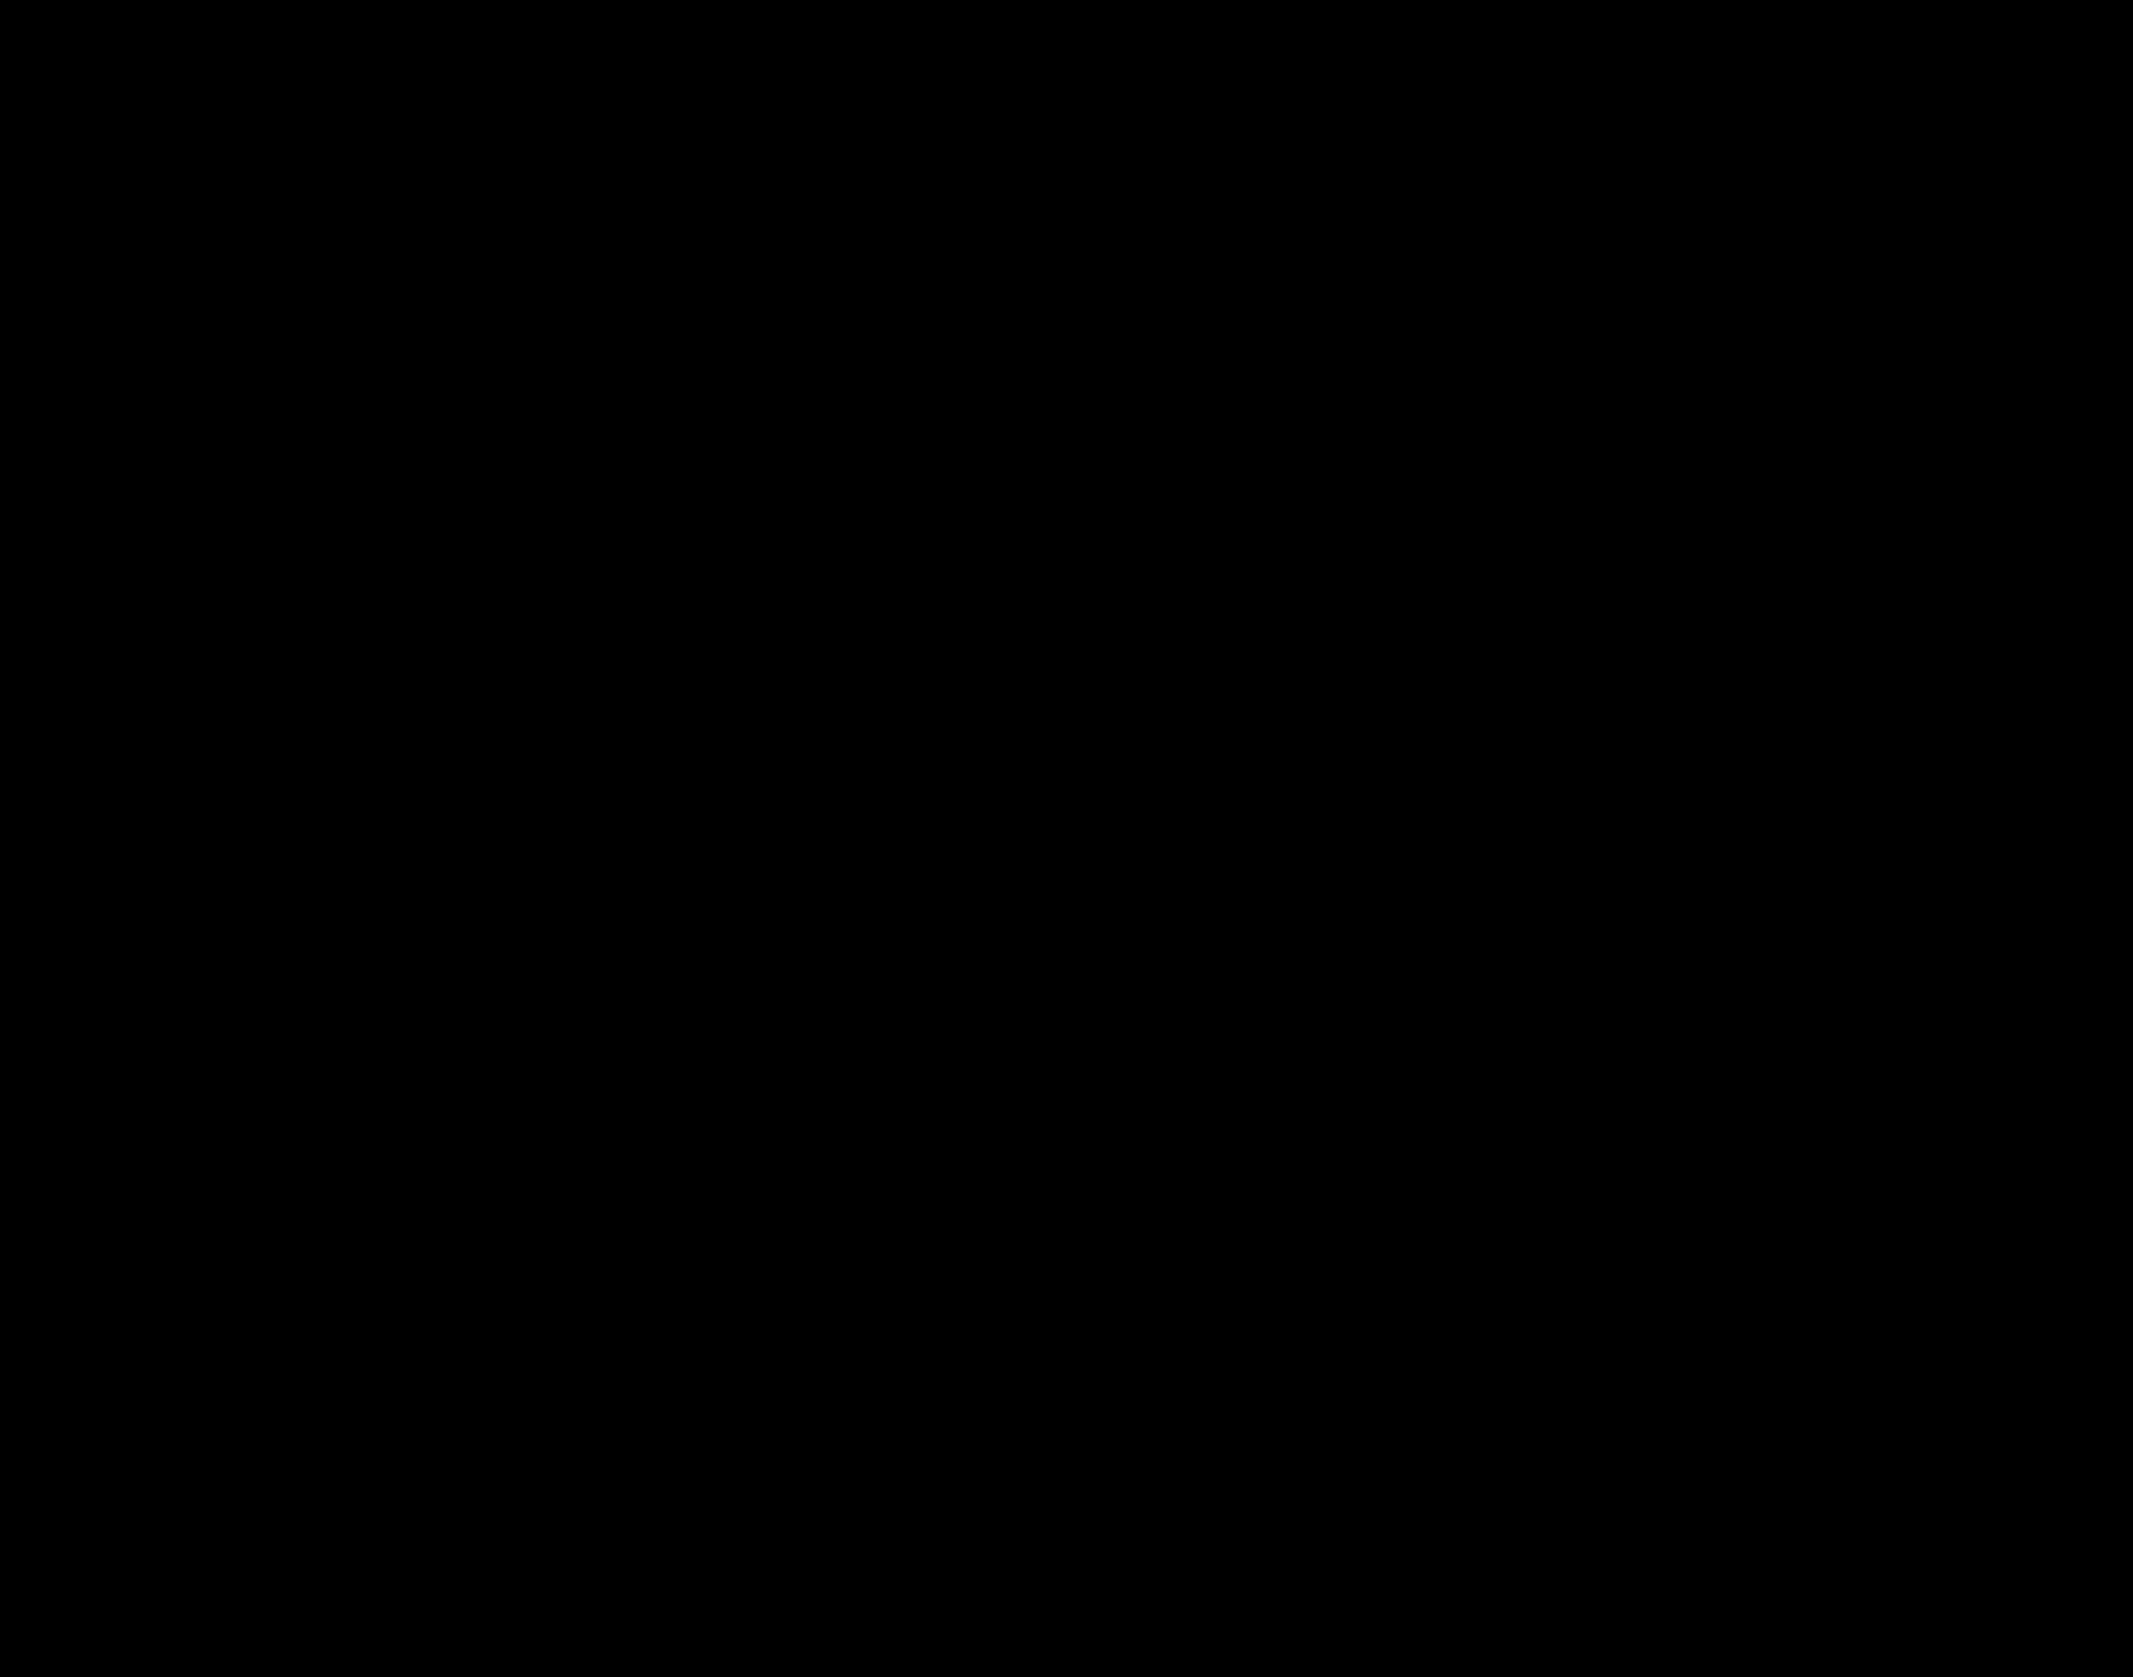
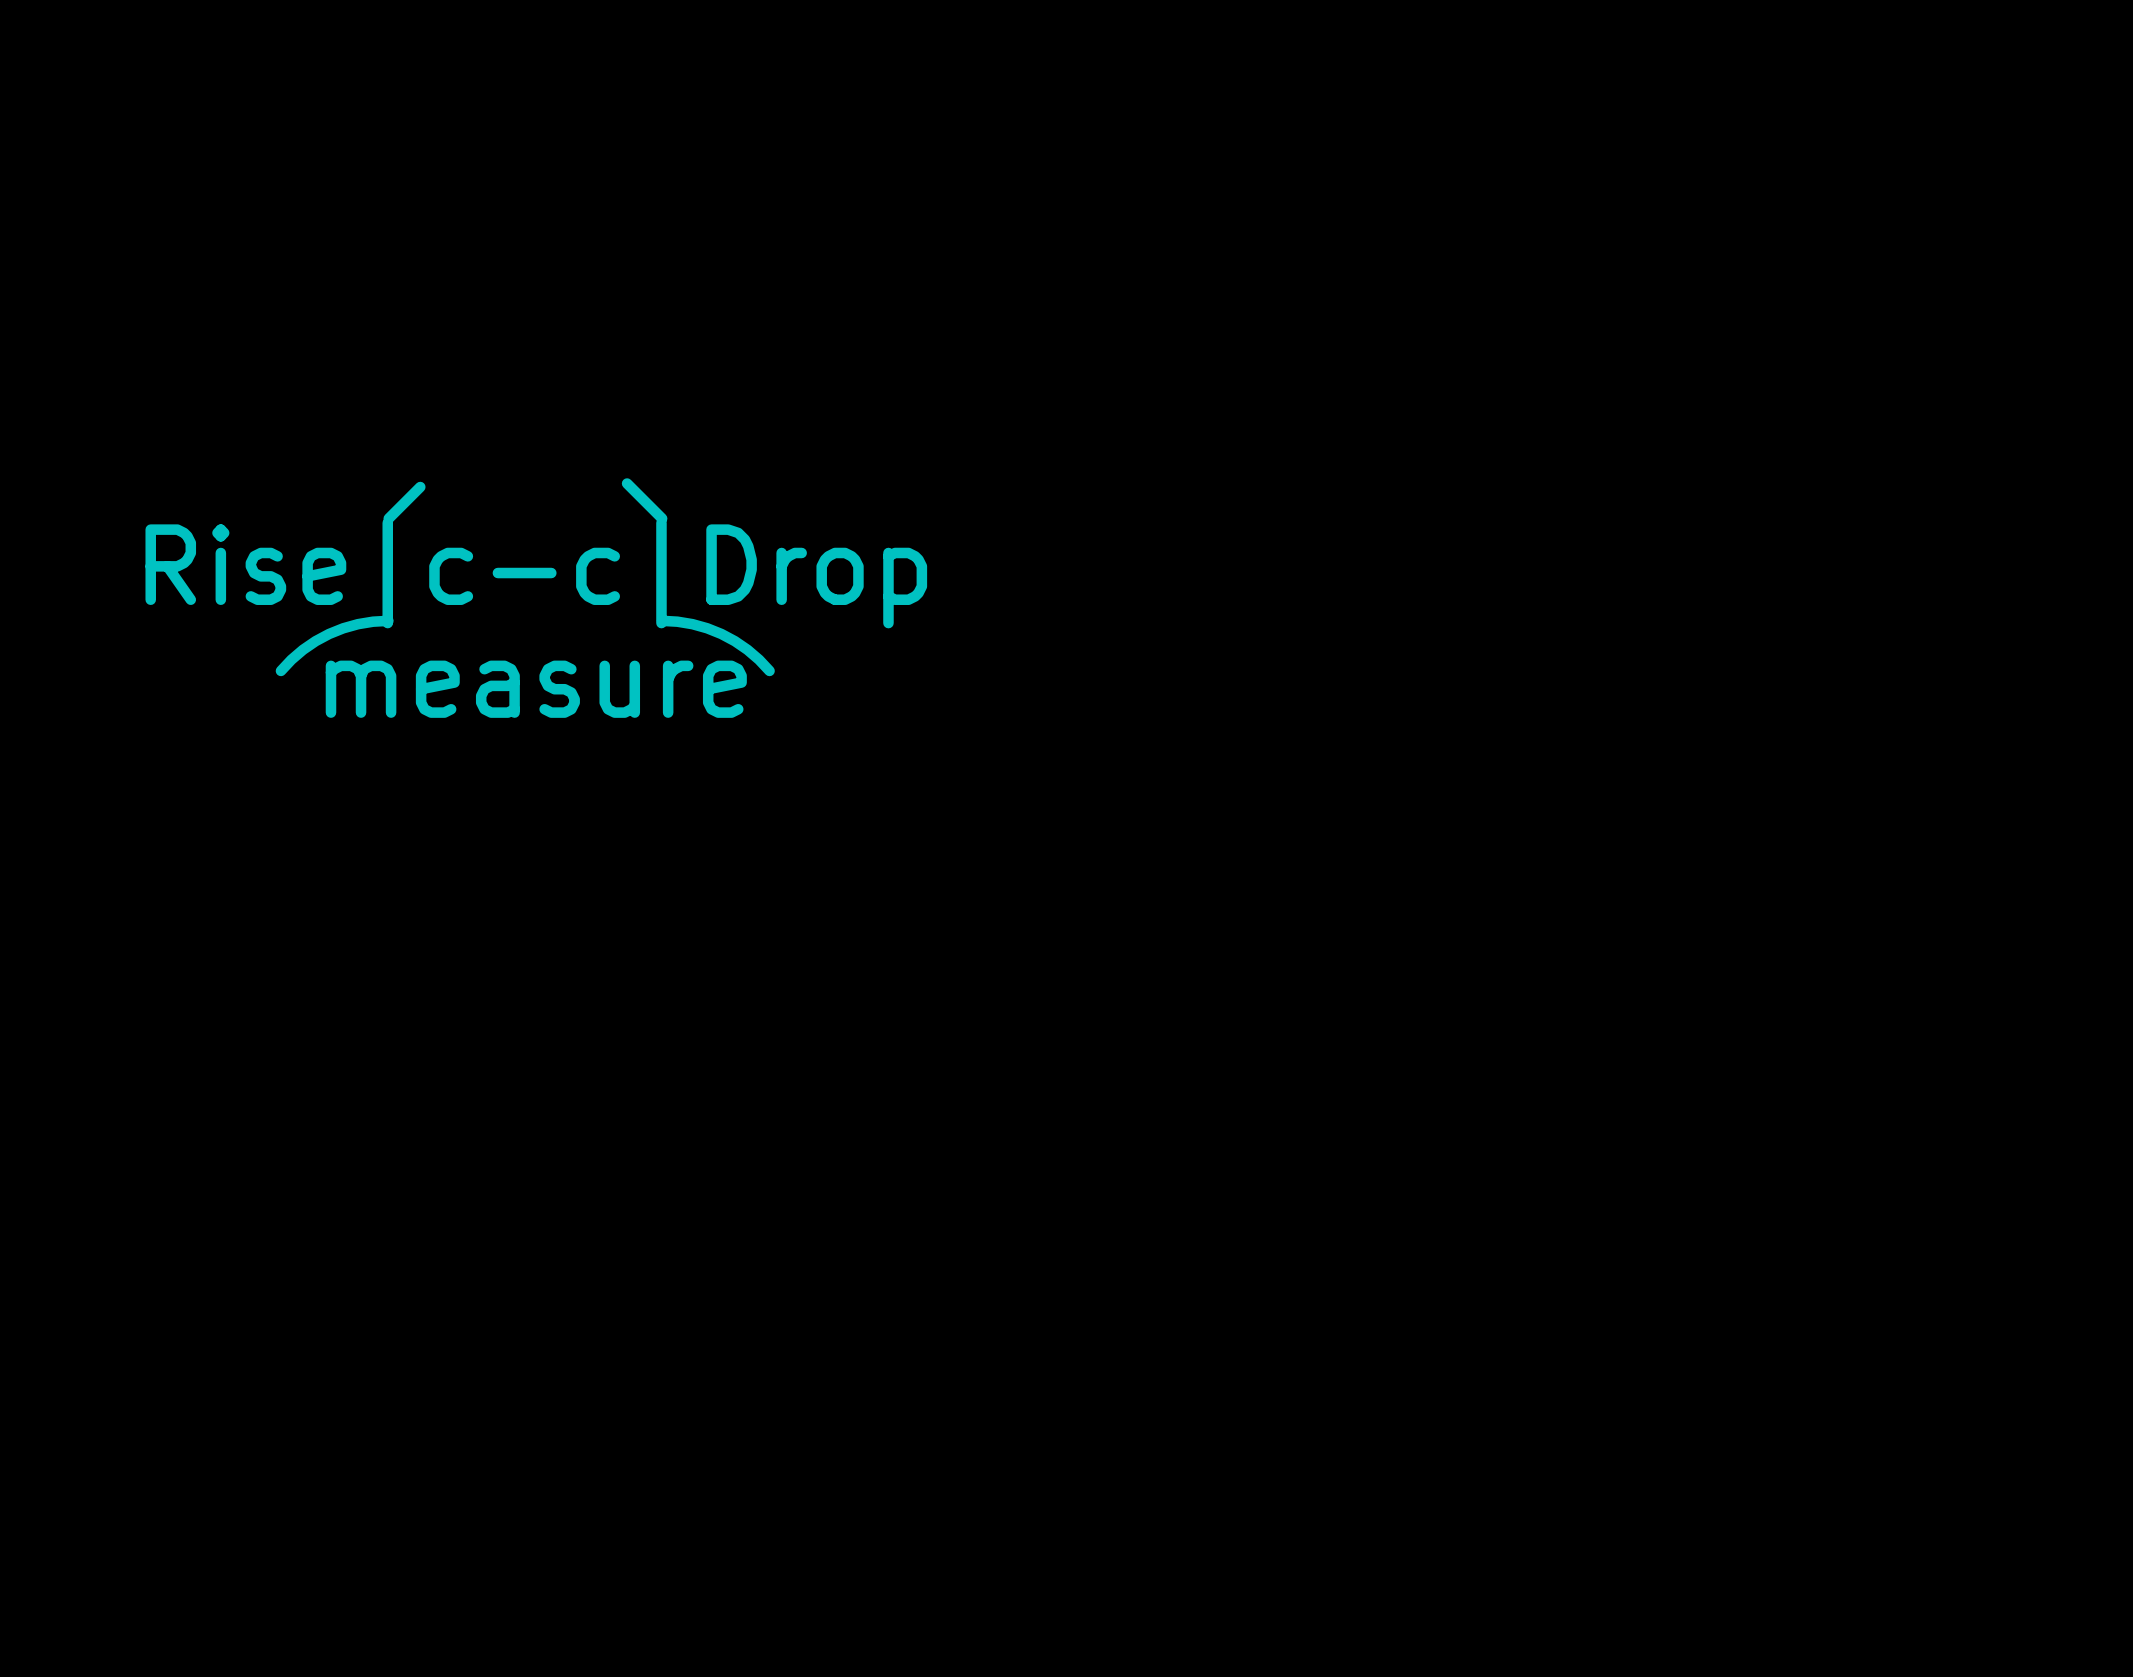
line: none -> (627, 483) (662, 518)
line: none -> (420, 487) (388, 518)
text: none -> Rise|c-c|Drop (536, 573)
line: none -> (388, 620) (358, 624) (329, 633) (303, 649) (280, 670)
line: none -> (662, 620) (692, 624) (721, 633) (747, 649) (769, 670)
text: none -> measure (536, 689)

